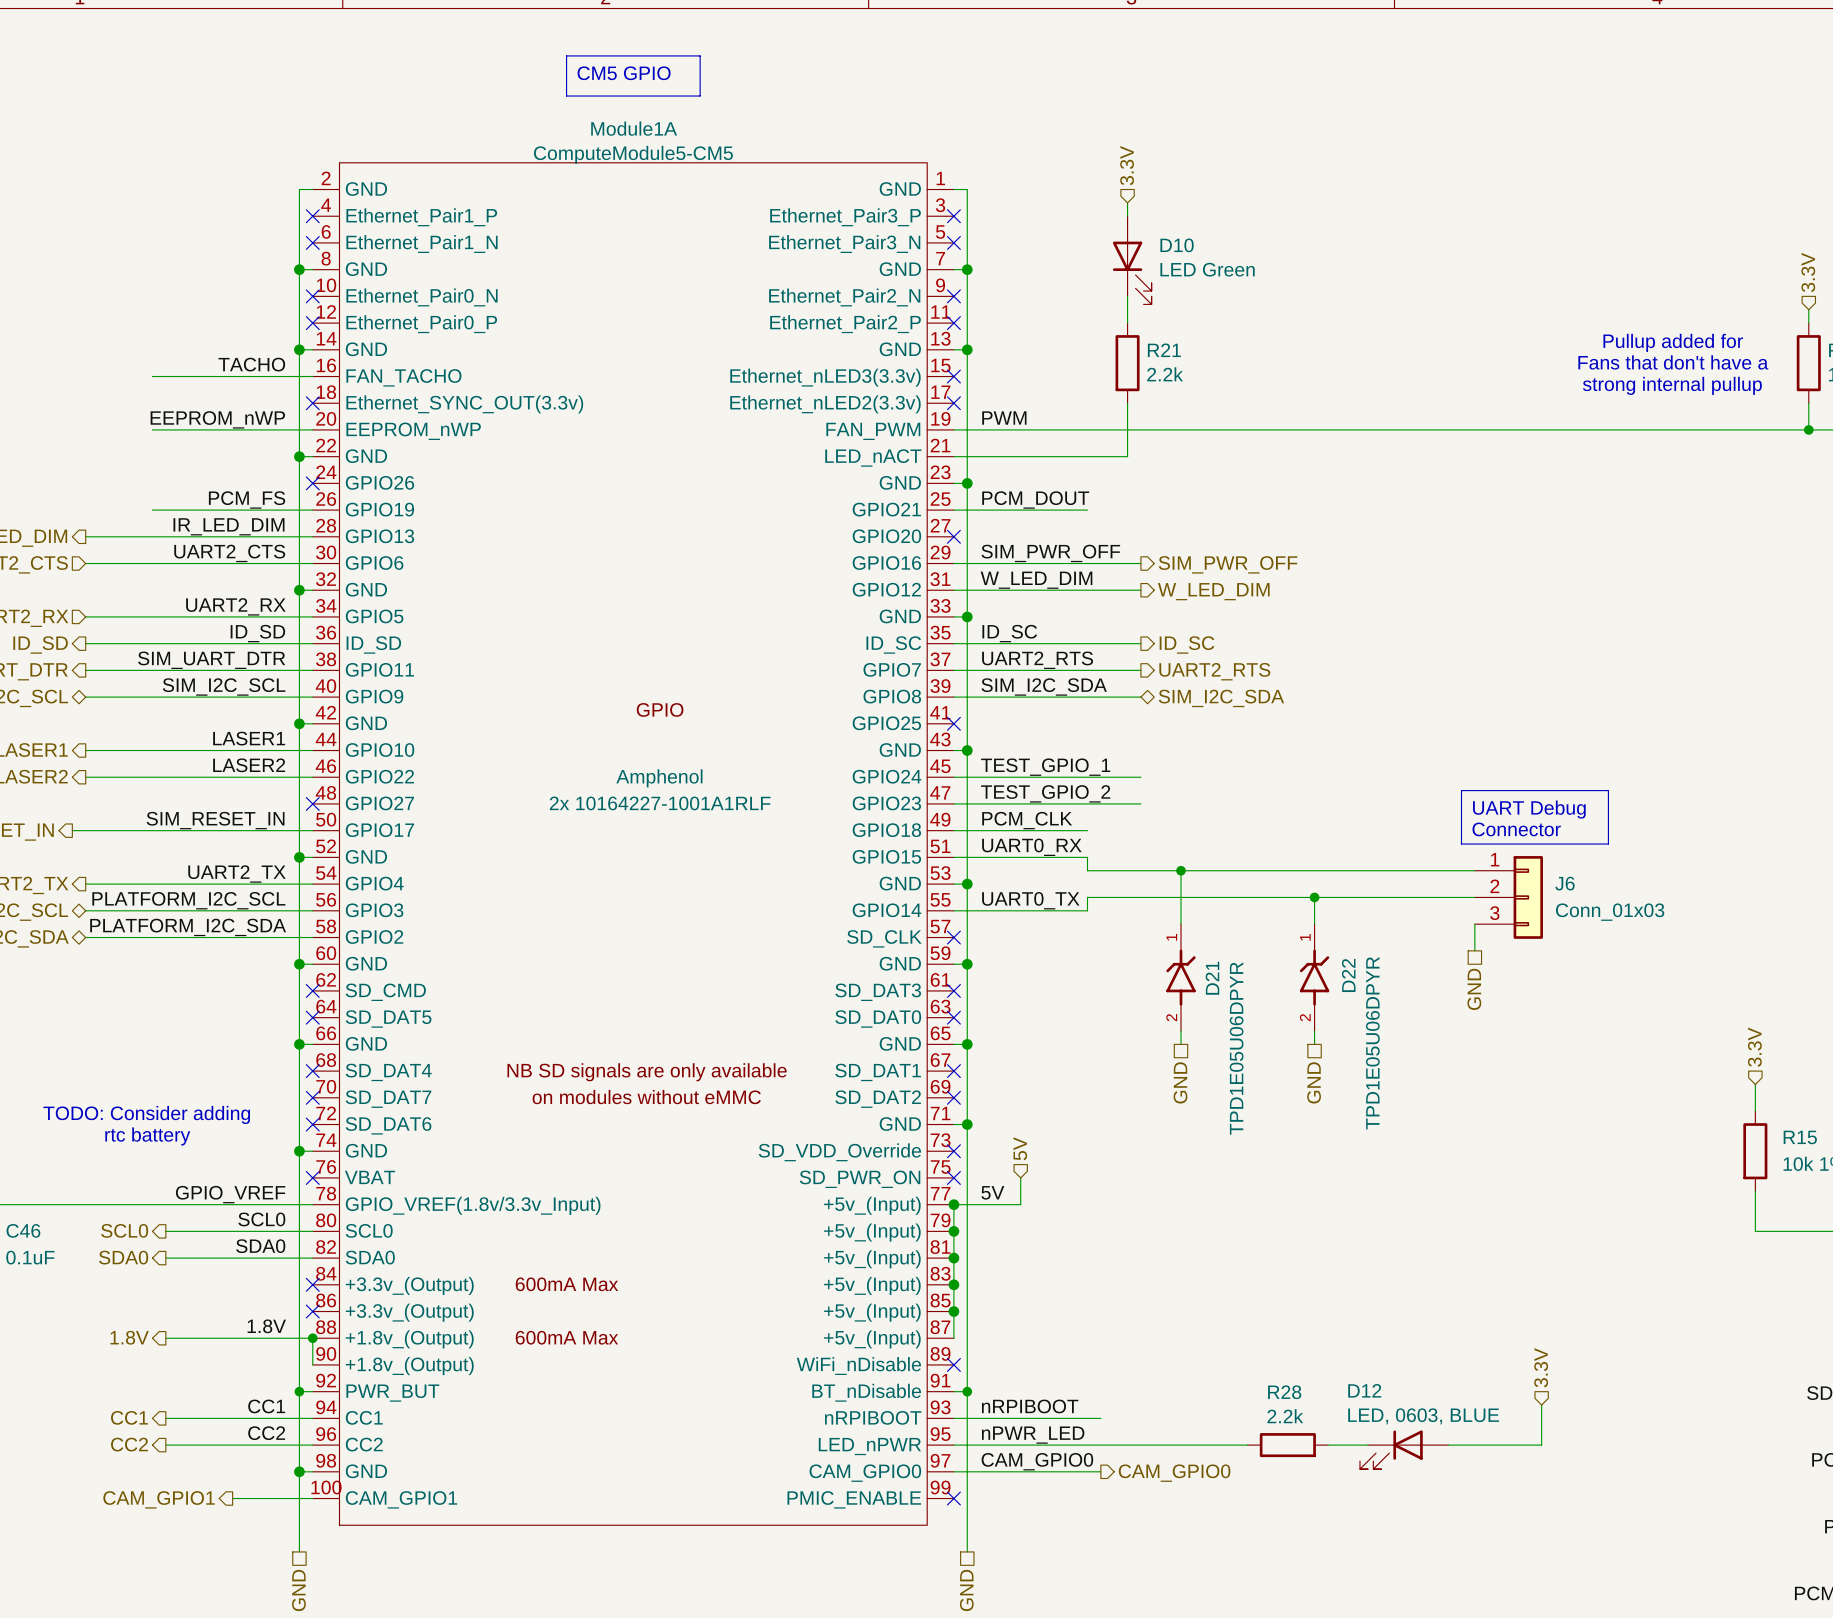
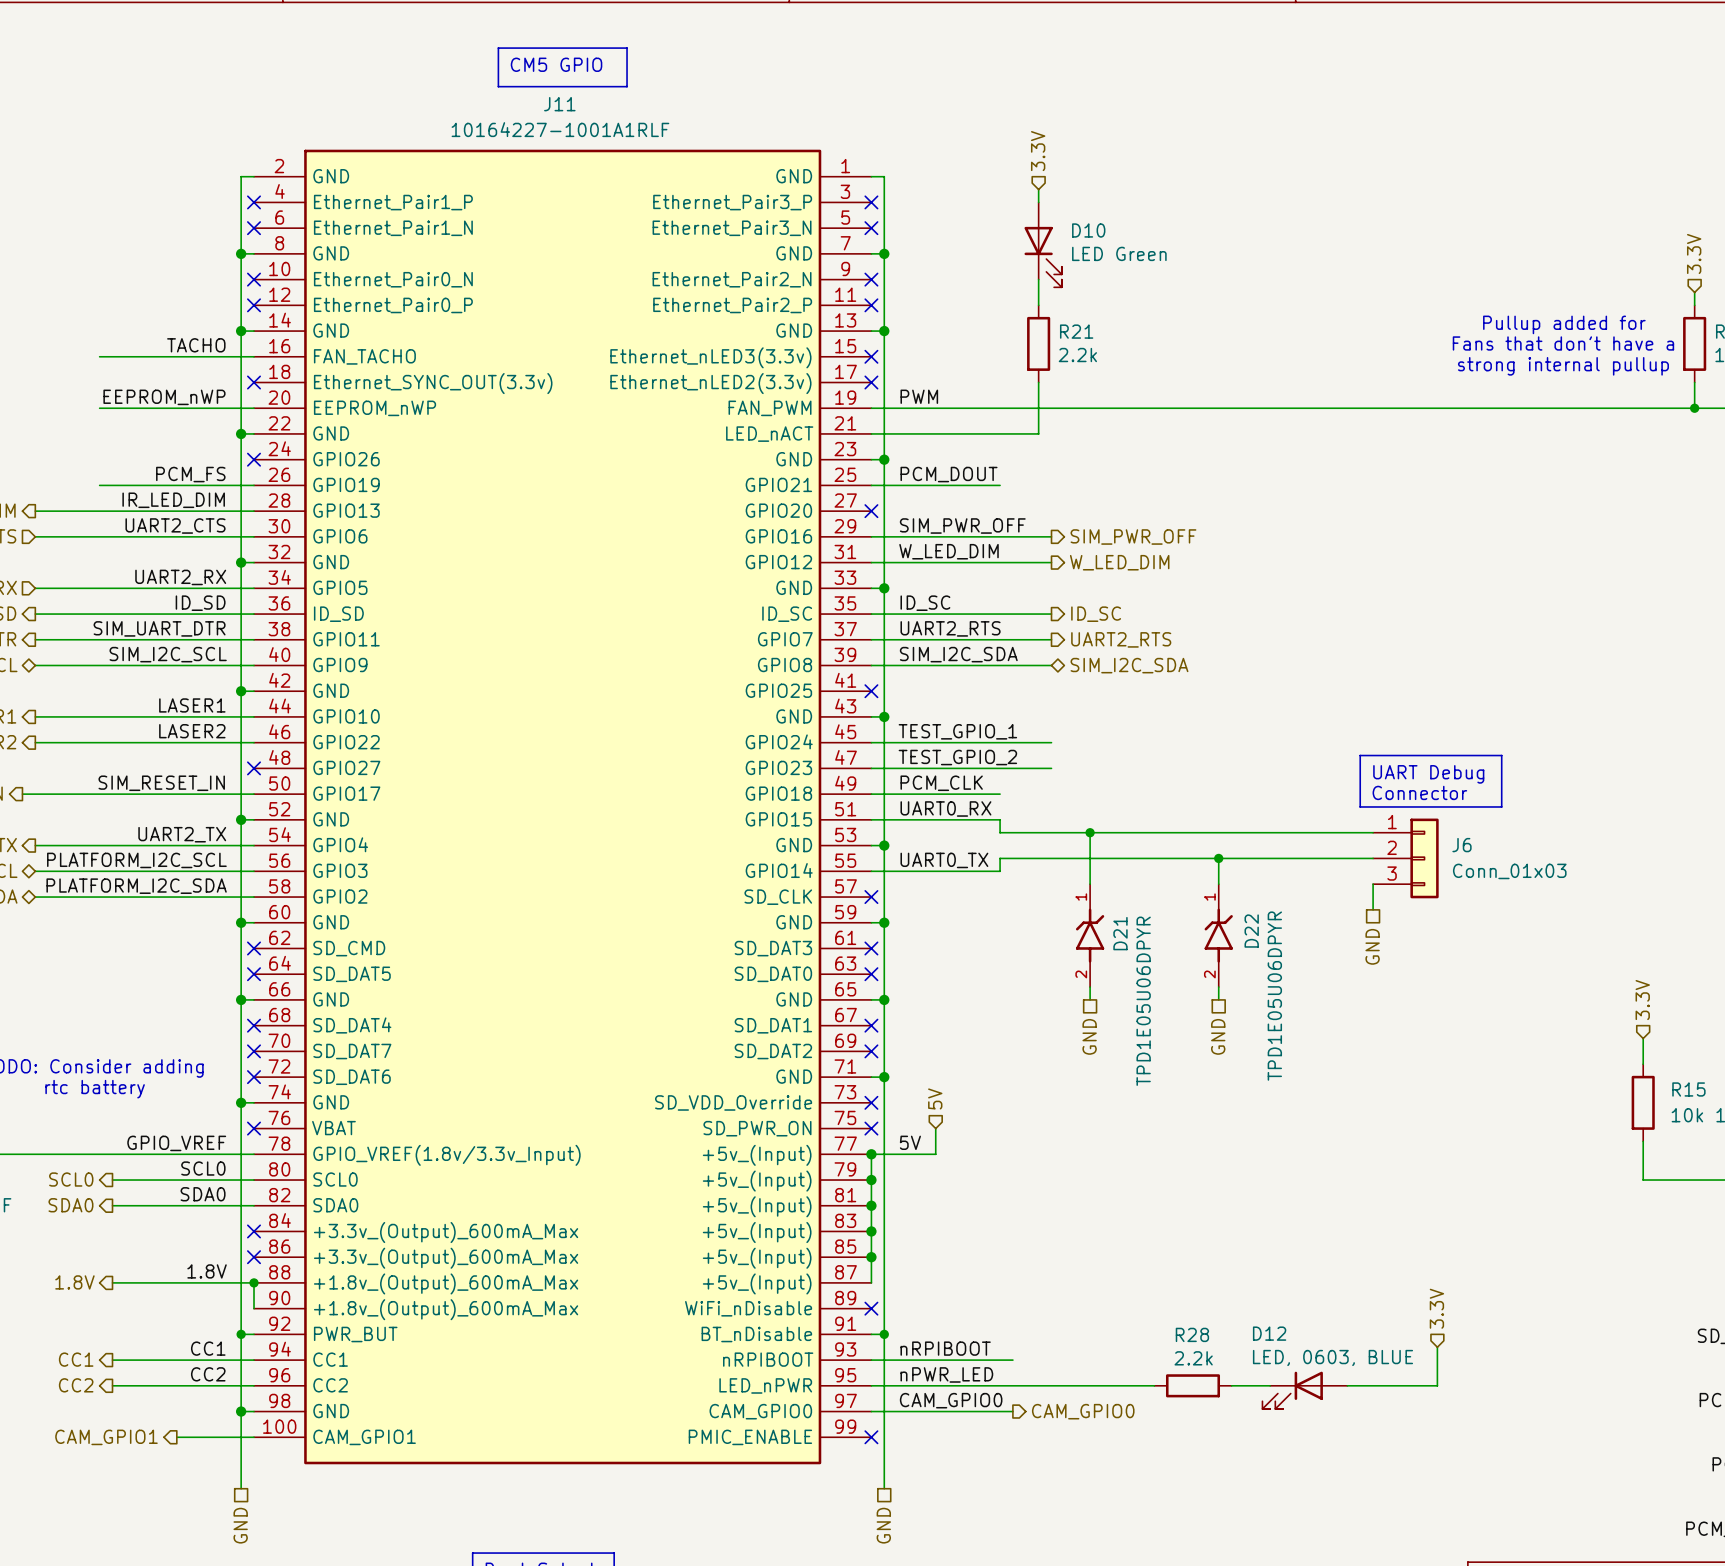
Module1A: ComputeModule5-CM5 (633, 844) -> none
J11: none -> 10164227-1001A1RLF (562, 806)

